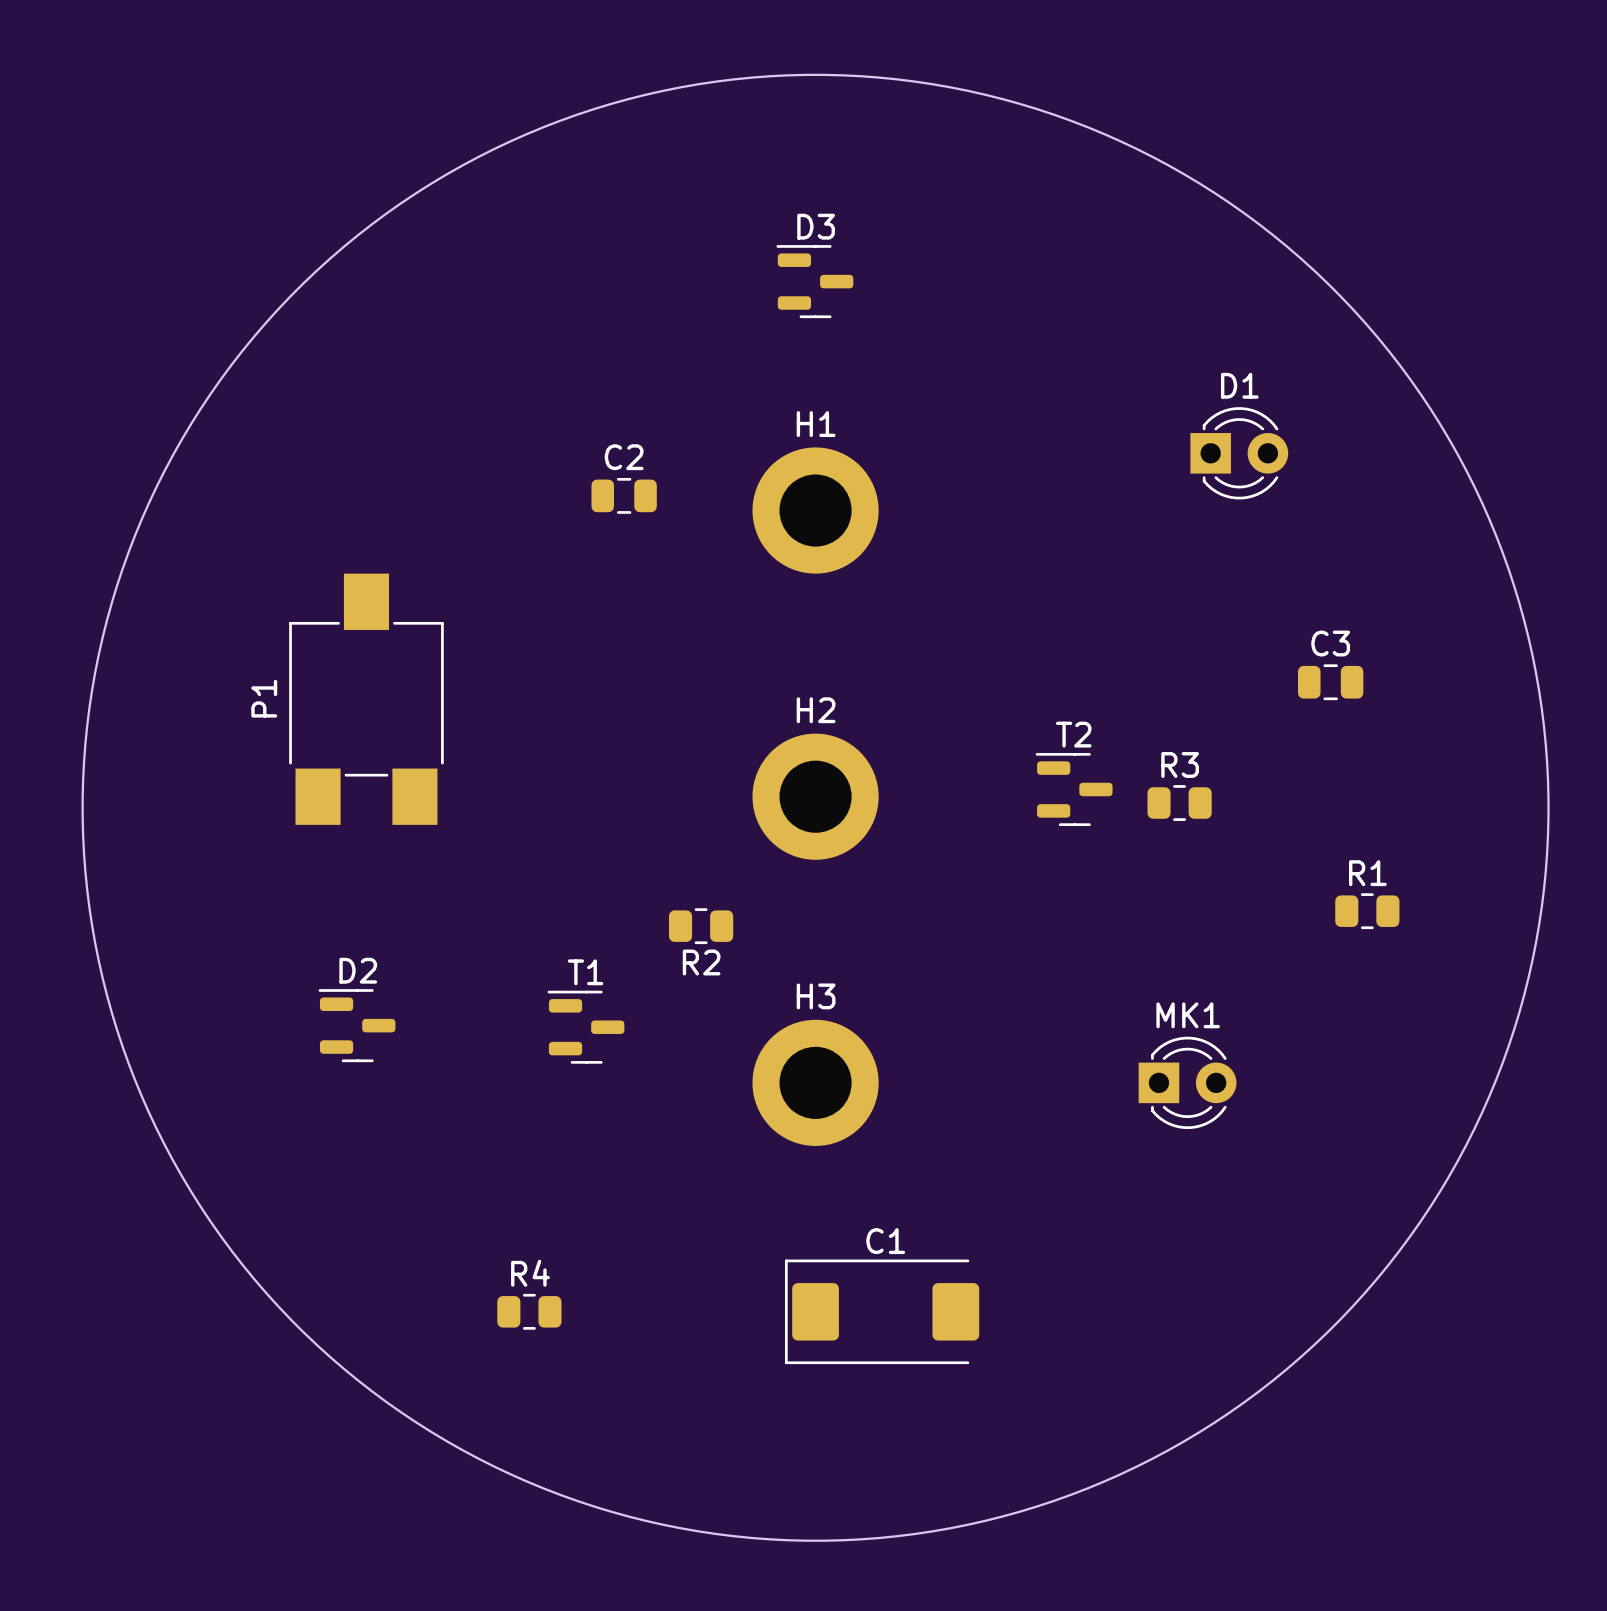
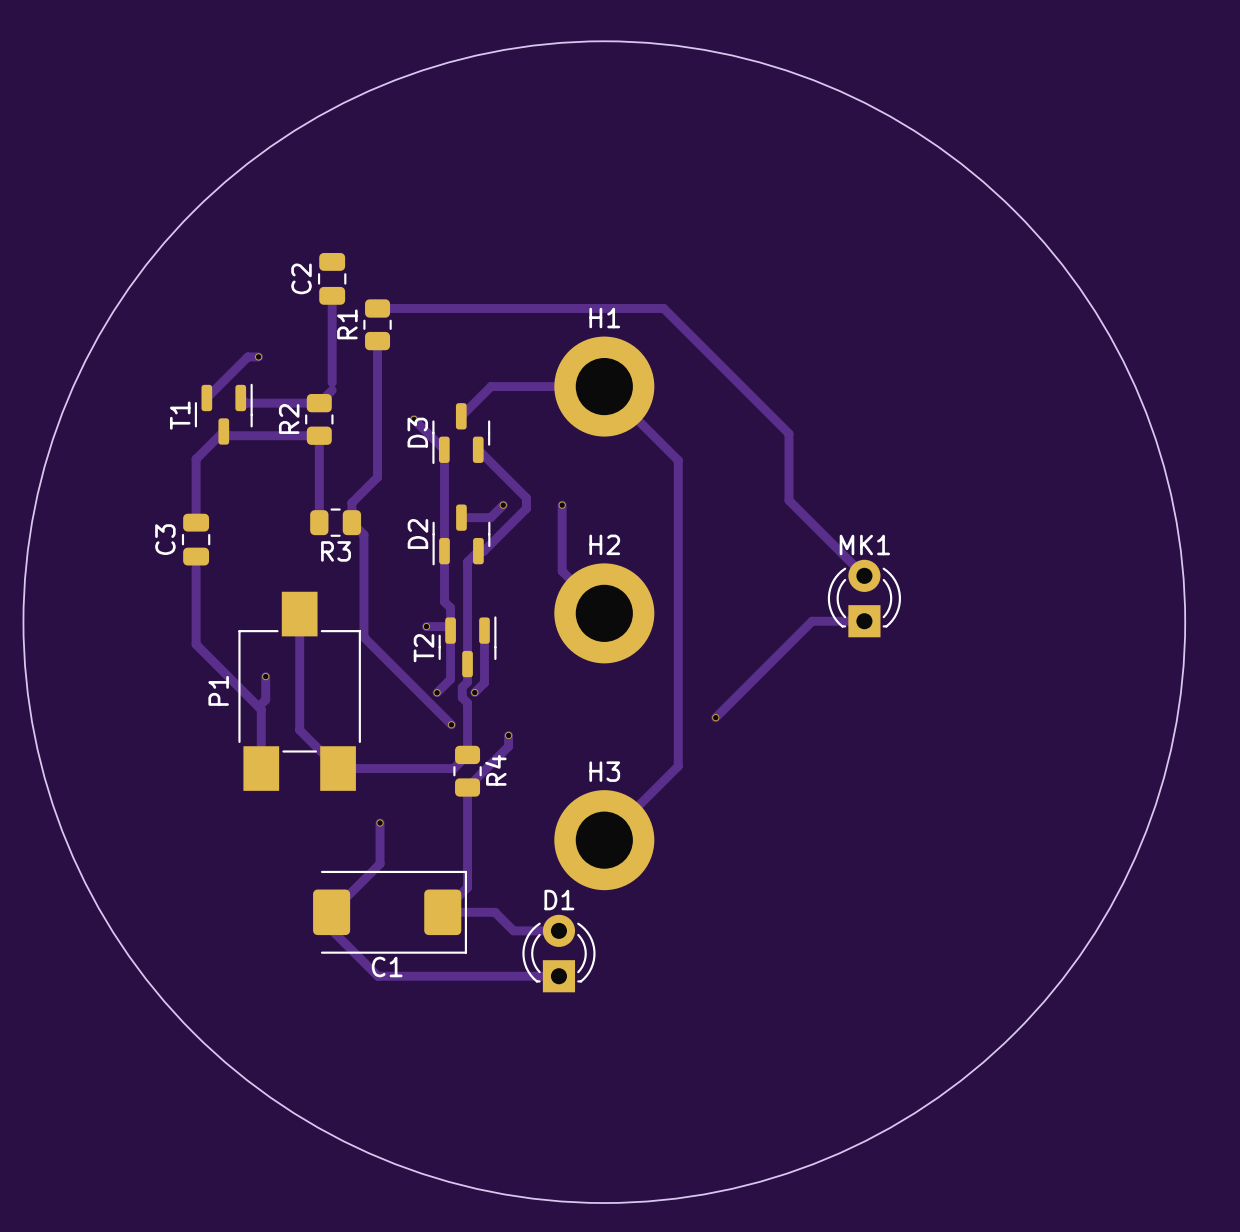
D3 rotation: 0° (814, 281) -> 90° counterclockwise (461, 433)
D3 position: (814, 281) -> (461, 433)
track: none -> (332, 295) (332, 382)
track: none -> (377, 308) (663, 308) (788, 433) (788, 500) (864, 575)
track: none -> (377, 341) (377, 477) (351, 502) (351, 522) (363, 534) (363, 637) (451, 724)
D1 rotation: 0° (1239, 453) -> 90° counterclockwise (558, 953)
D1 position: (1239, 453) -> (558, 953)
C2 name position: C2 (624, 457) -> C2 (301, 278)
track: none -> (258, 356) (247, 356) (206, 398)
via: none -> (258, 356)
C2 rotation: 0° (624, 495) -> 90° clockwise (332, 278)
C2 position: (624, 495) -> (332, 278)
track: none -> (332, 390) (319, 403) (245, 403) (240, 398)
track: none -> (461, 416) (491, 386) (604, 386) (678, 460) (678, 766) (604, 840)
track: none -> (413, 419) (444, 449) (444, 601) (450, 607) (450, 679) (437, 692)
via: none -> (413, 419)
track: none -> (478, 449) (526, 497) (526, 508) (483, 551) (478, 551) (467, 562) (467, 682) (462, 687) (462, 697) (467, 702) (467, 754) (453, 768) (338, 768) (299, 730) (299, 614)
C3 name position: C3 (1330, 643) -> C3 (165, 539)
track: none -> (503, 505) (490, 517) (461, 517)
via: none -> (503, 505)
track: none -> (562, 505) (562, 571) (604, 613)
via: none -> (562, 505)
track: none -> (319, 522) (319, 435) (228, 435) (223, 431) (196, 459) (196, 525)
C3 rotation: 0° (1330, 682) -> 90° clockwise (196, 539)
C3 position: (1330, 682) -> (196, 539)
P1 position: (366, 699) -> (299, 691)
T2 name position: T2 (1073, 734) -> T2 (424, 648)
track: none -> (196, 568) (196, 644) (261, 709) (261, 768)
R3 name position: R3 (1180, 764) -> R3 (336, 551)
T2 rotation: 0° (1074, 789) -> 90° clockwise (467, 646)
T2 position: (1074, 789) -> (467, 646)
R3 position: (1179, 803) -> (335, 522)
track: none -> (864, 621) (812, 621) (715, 717)
track: none -> (426, 626) (446, 626) (450, 630)
via: none -> (426, 626)
track: none -> (484, 630) (484, 682) (474, 692)
R1 name position: R1 (1367, 873) -> R1 (347, 324)
track: none -> (265, 676) (265, 699) (258, 706)
via: none -> (265, 676)
via: none -> (437, 692)
via: none -> (474, 692)
R1 rotation: 0° (1367, 911) -> 90° clockwise (377, 324)
R1 position: (1367, 911) -> (377, 324)
R2 rotation: 0° (701, 926) -> 90° clockwise (319, 419)
R2 position: (701, 926) -> (319, 419)
via: none -> (715, 717)
via: none -> (451, 724)
track: none -> (508, 735) (508, 746) (467, 787) (467, 887) (442, 912) (495, 912) (513, 930) (558, 930)
via: none -> (508, 735)
T1 name position: T1 (585, 972) -> T1 (180, 415)
D2 rotation: 0° (357, 1025) -> 90° counterclockwise (461, 534)
D2 position: (357, 1025) -> (461, 534)
T1 rotation: 0° (585, 1027) -> 90° clockwise (223, 414)
T1 position: (585, 1027) -> (223, 414)
MK1 footprint: [1138, 1036, 1237, 1130] -> [827, 559, 901, 638]
track: none -> (380, 823) (380, 863) (331, 912) (331, 929) (377, 976) (558, 976)
via: none -> (380, 823)
R4 rotation: 0° (529, 1311) -> 90° clockwise (467, 771)
R4 position: (529, 1311) -> (467, 771)
C1 rotation: 0° (882, 1311) -> 180° (390, 912)
C1 position: (882, 1311) -> (390, 912)

